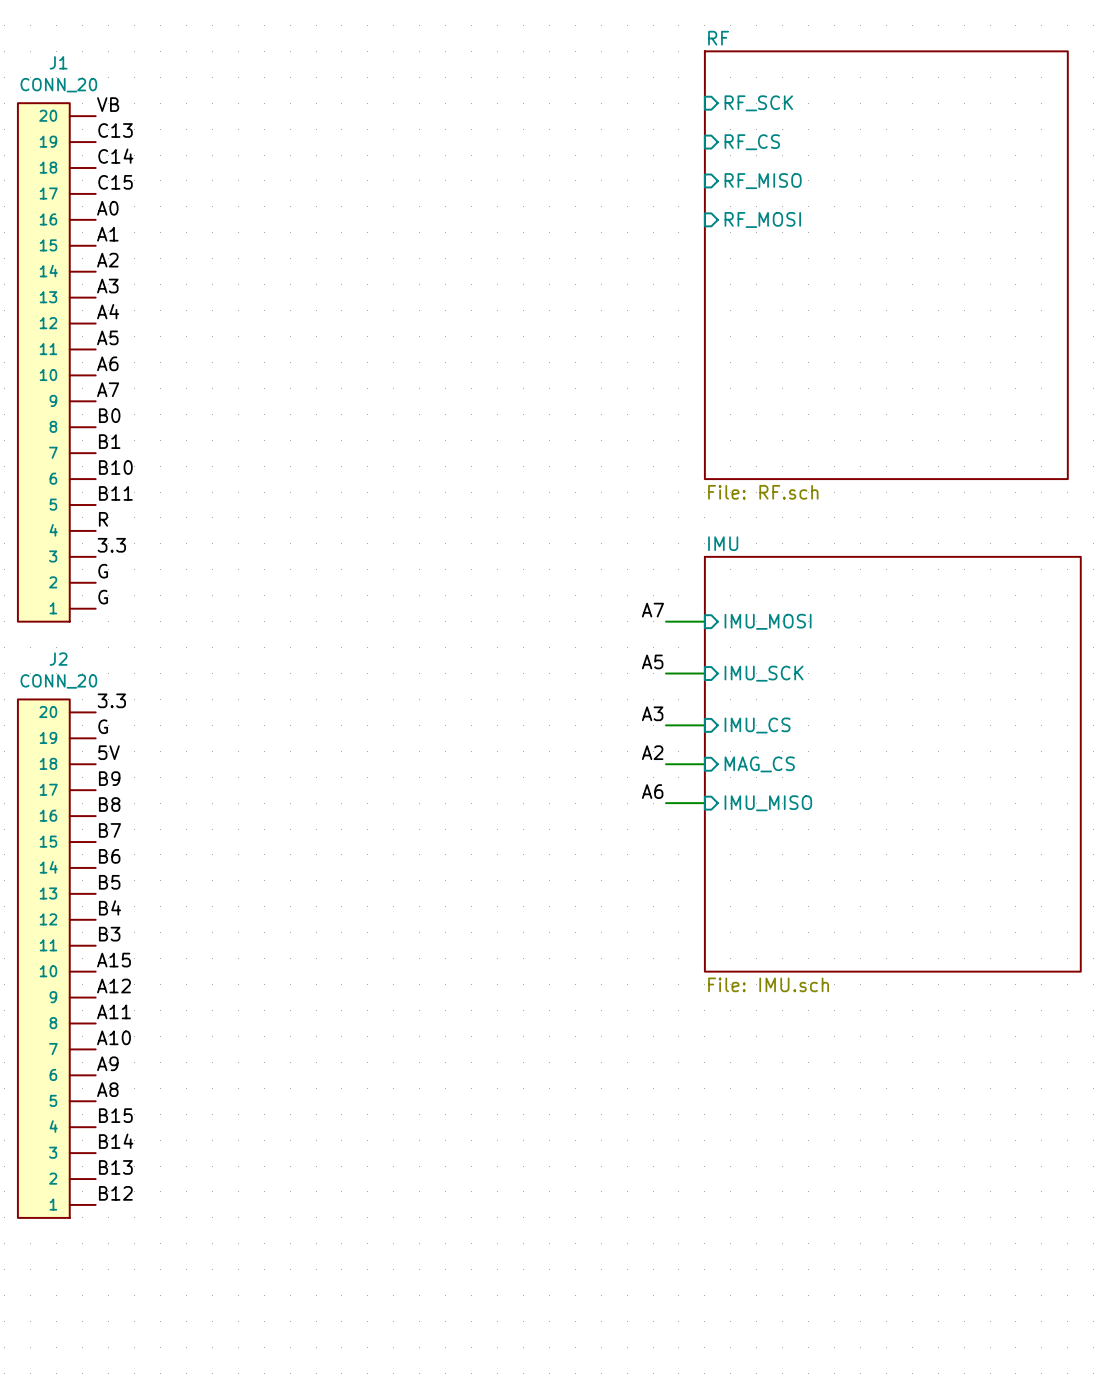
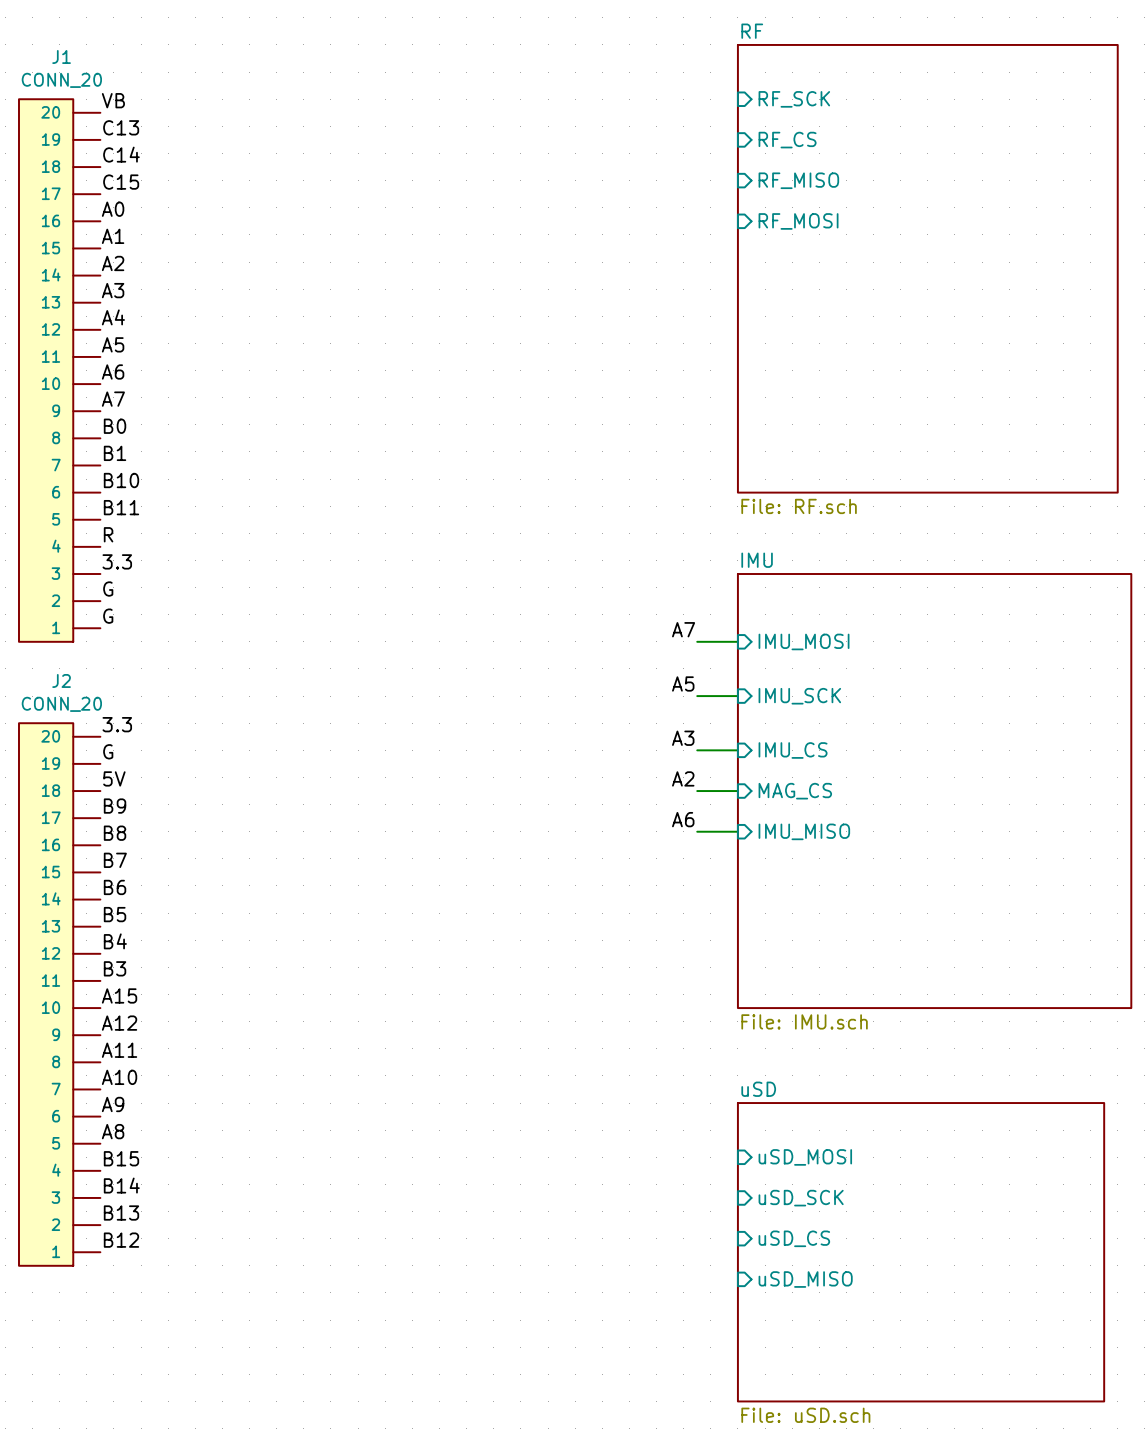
sheet pin: none -> uSD_MOSI (805, 1157)
sheet pin: none -> uSD_SCK (801, 1198)
sheet pin: none -> uSD_CS (794, 1238)
sheet uSD: none -> File: uSD.sch (921, 1252)
sheet pin: none -> uSD_MISO (805, 1279)

